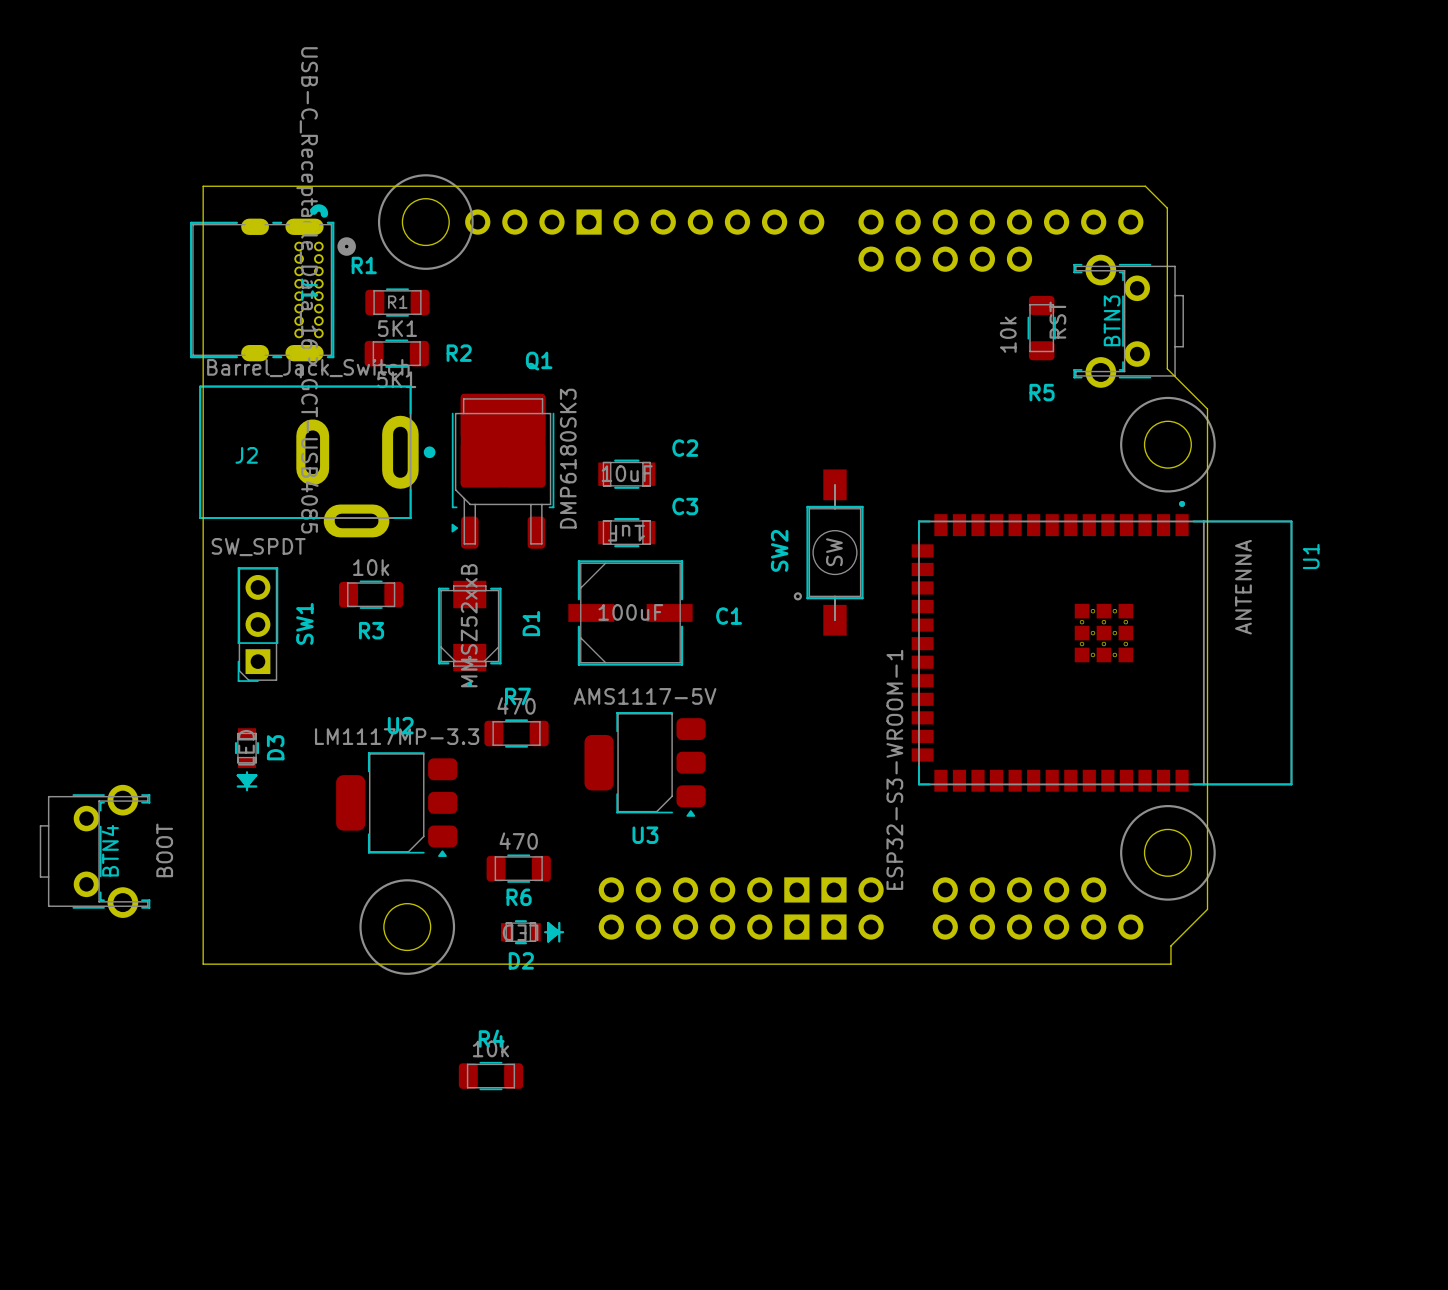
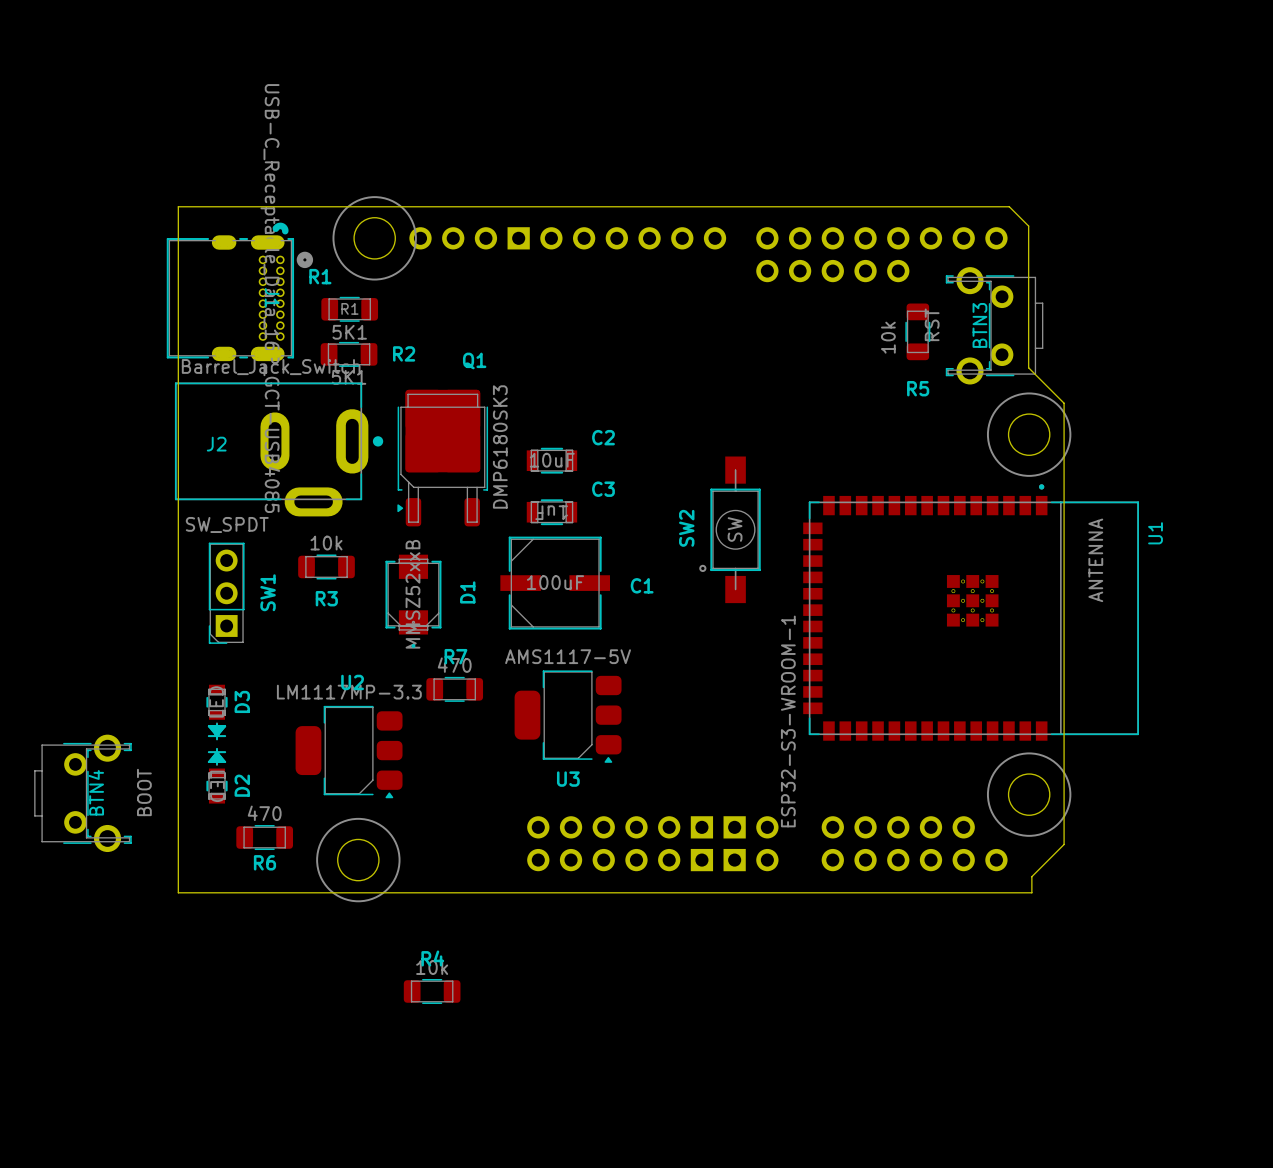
R6 position: (518, 868) -> (264, 837)
D2 rotation: 0° (532, 932) -> 90° counterclockwise (217, 775)
D2 position: (532, 932) -> (217, 775)

